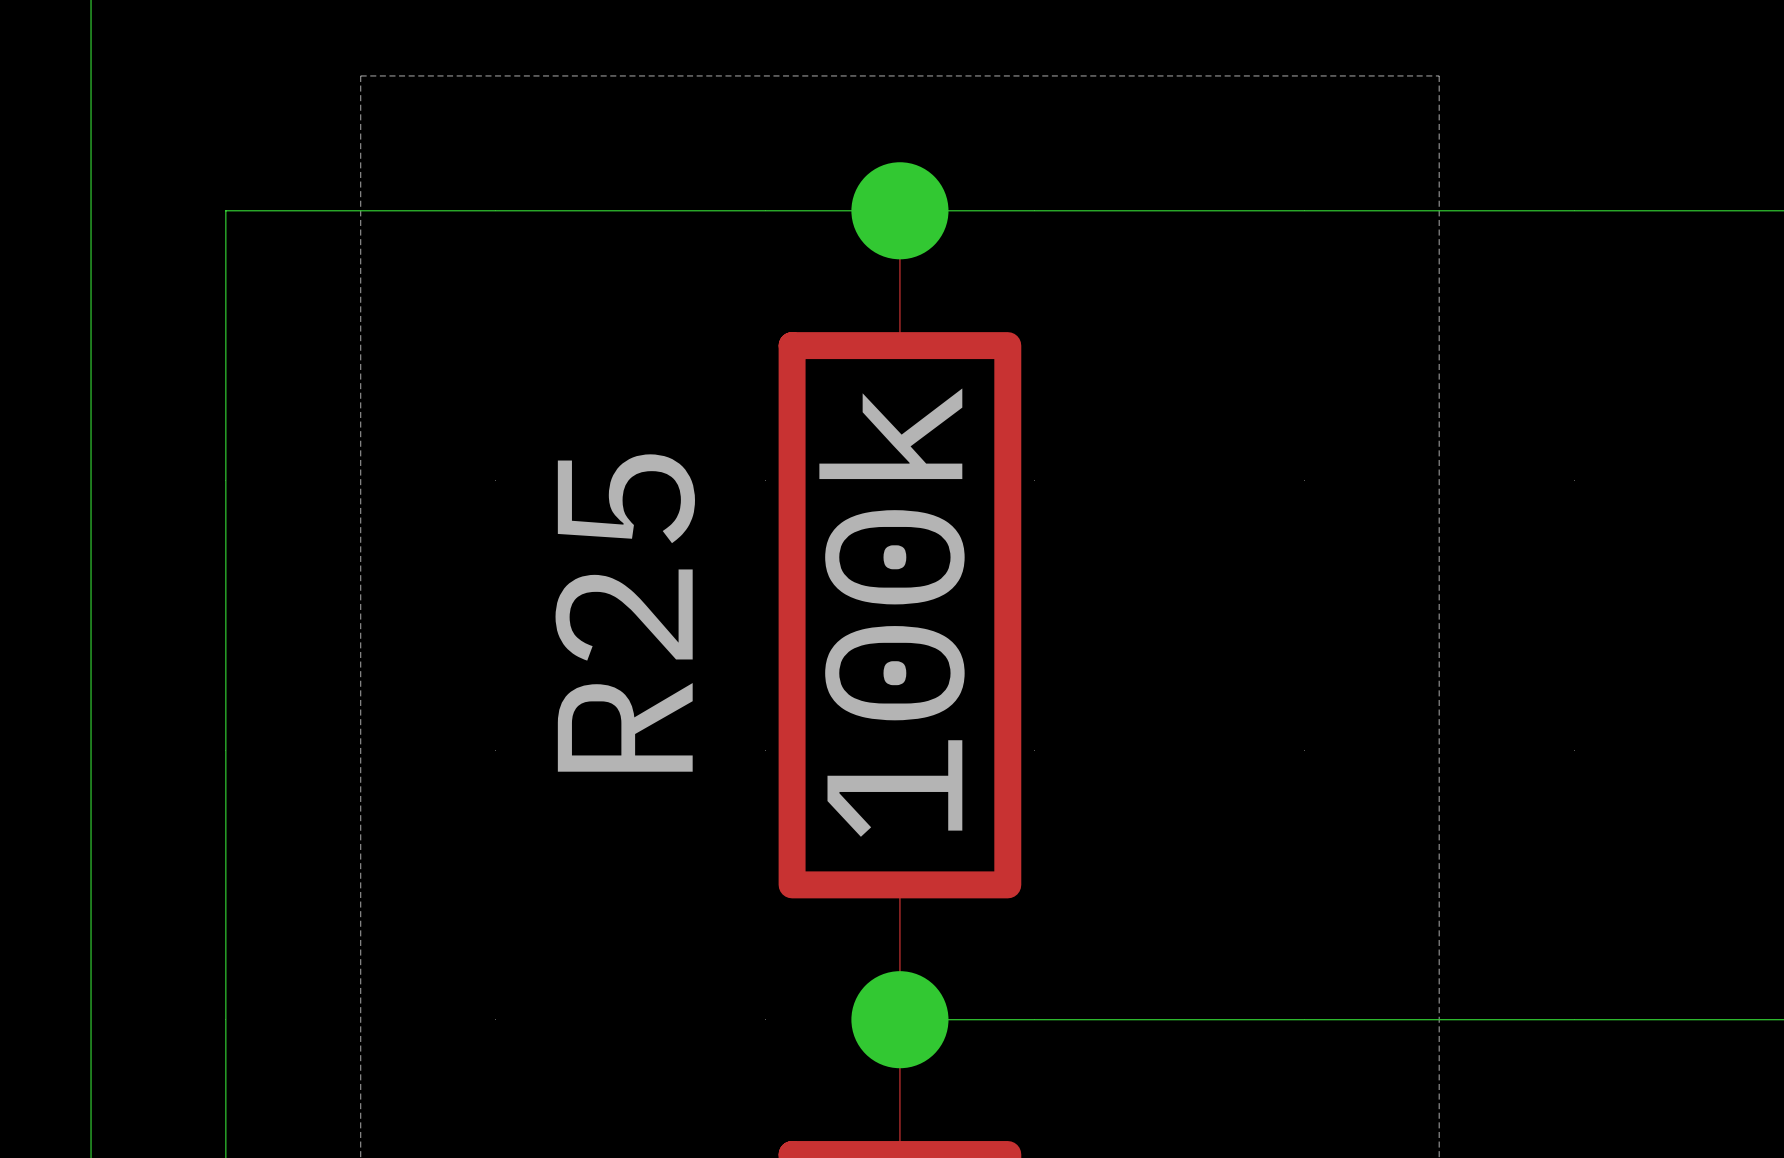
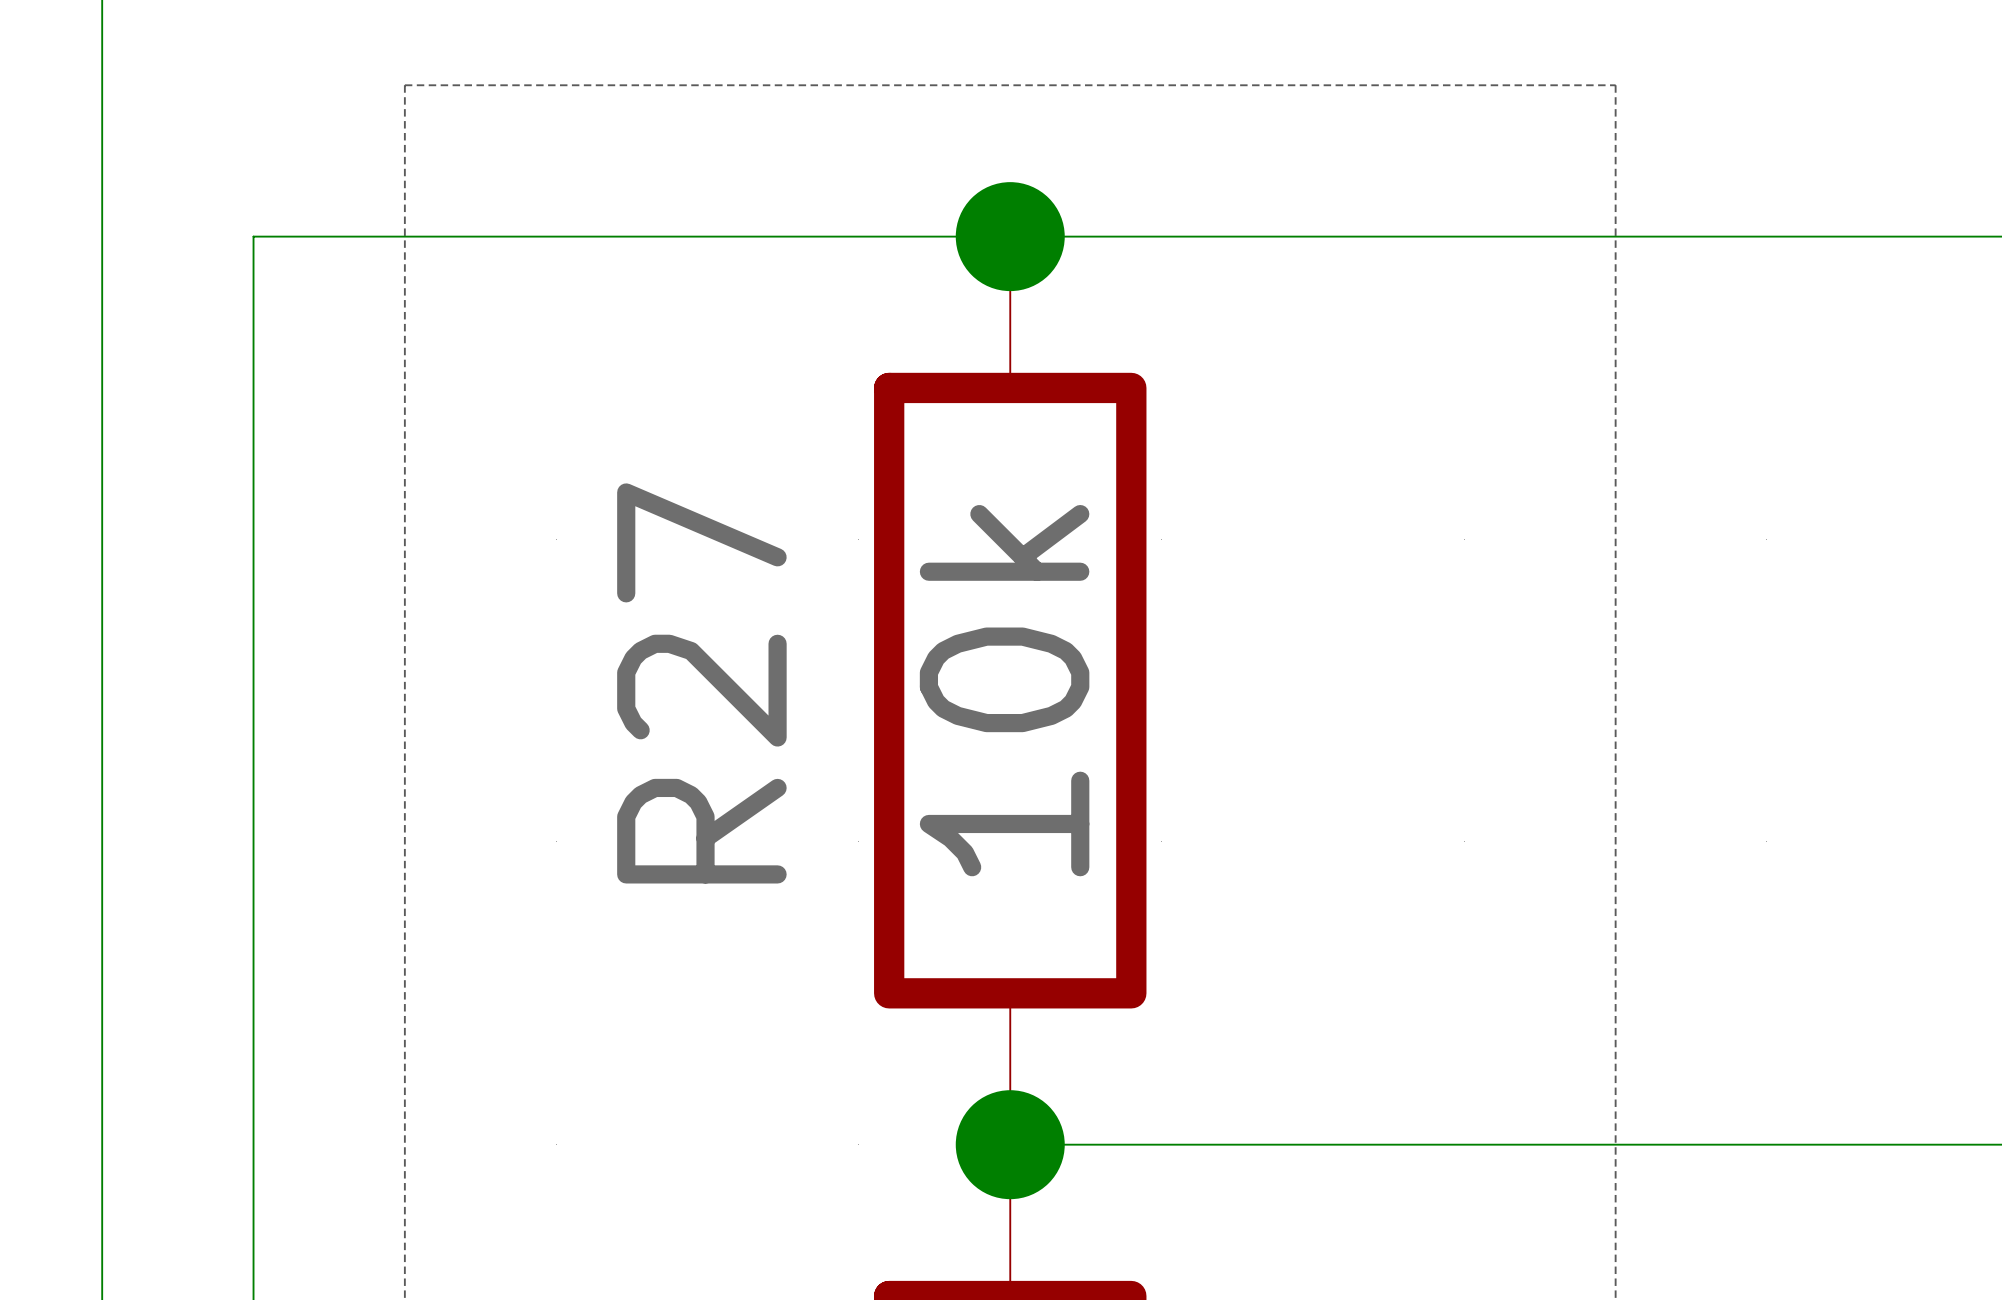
R25 value: 100k (892, 612) -> 10k (1004, 690)
R25 name: R25 (625, 613) -> R27 (701, 683)

